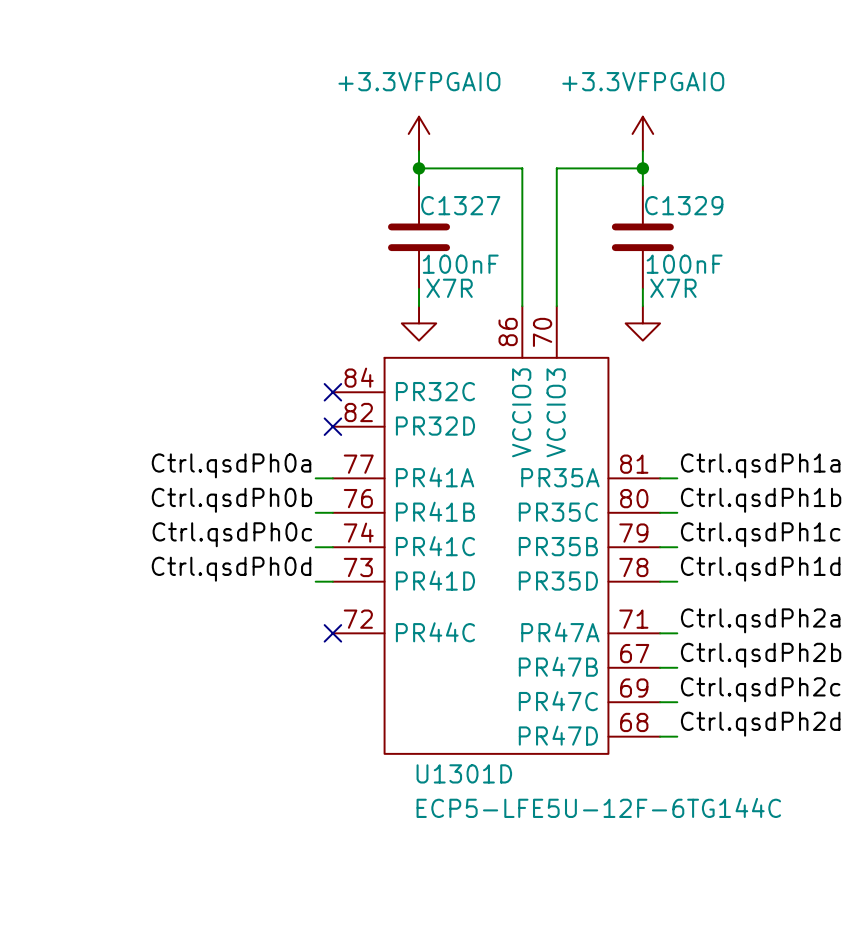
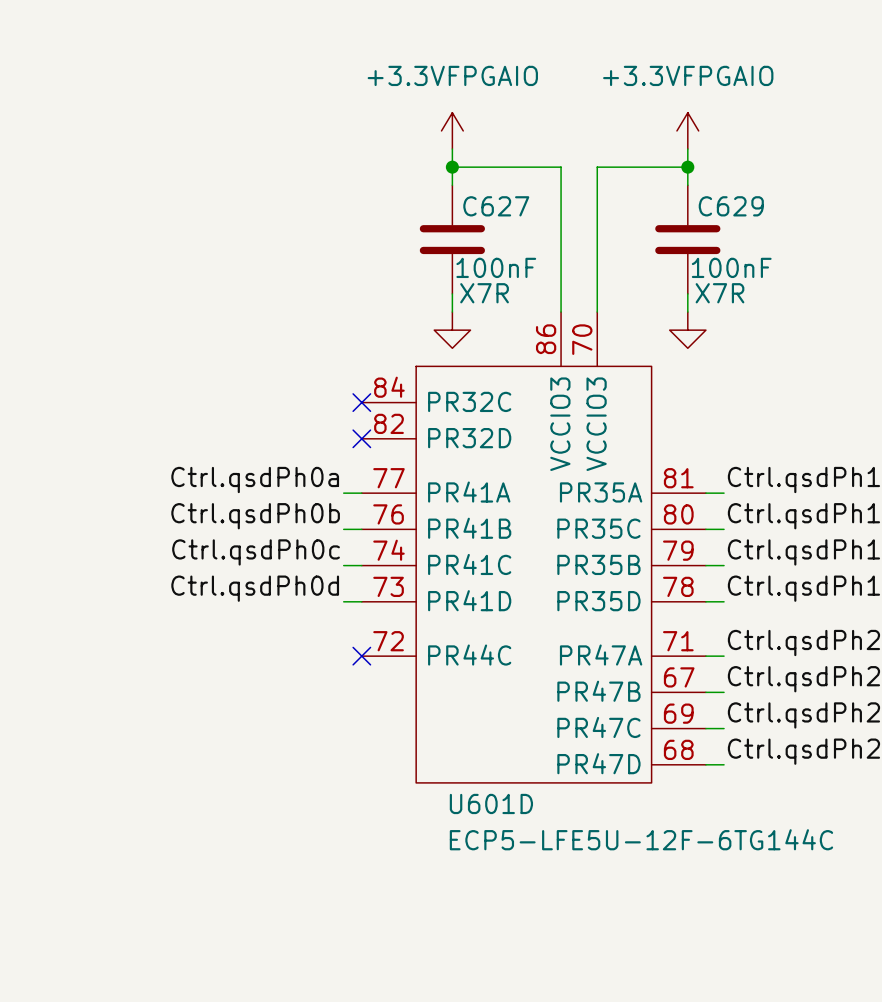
C1327 name: C1327 (460, 205) -> C627 (496, 206)
C1329 name: C1329 (684, 205) -> C629 (731, 206)
U1301D name: U1301D (464, 773) -> U601D (491, 803)

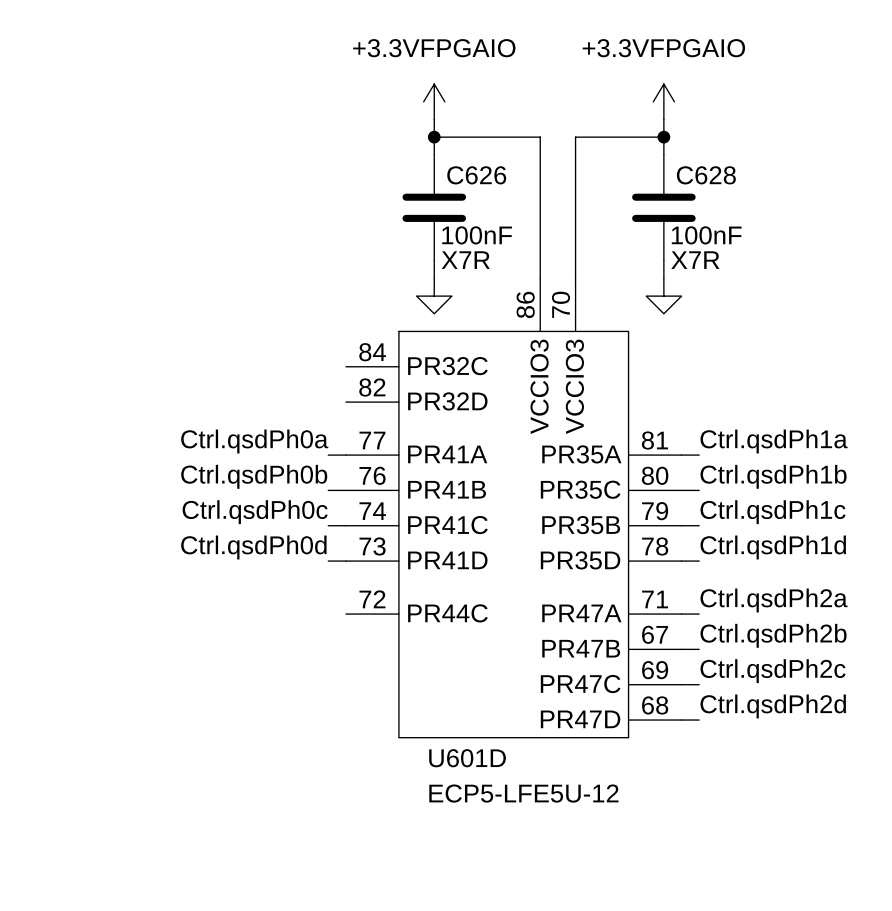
C627 name: C627 (496, 206) -> C626 (476, 175)
C629 name: C629 (731, 206) -> C628 (706, 175)
no-connect mark: (361, 402) -> none
no-connect mark: (361, 438) -> none
no-connect mark: (361, 656) -> none
U601D value: ECP5-LFE5U-12F-6TG144C (641, 839) -> ECP5-LFE5U-12 (523, 793)

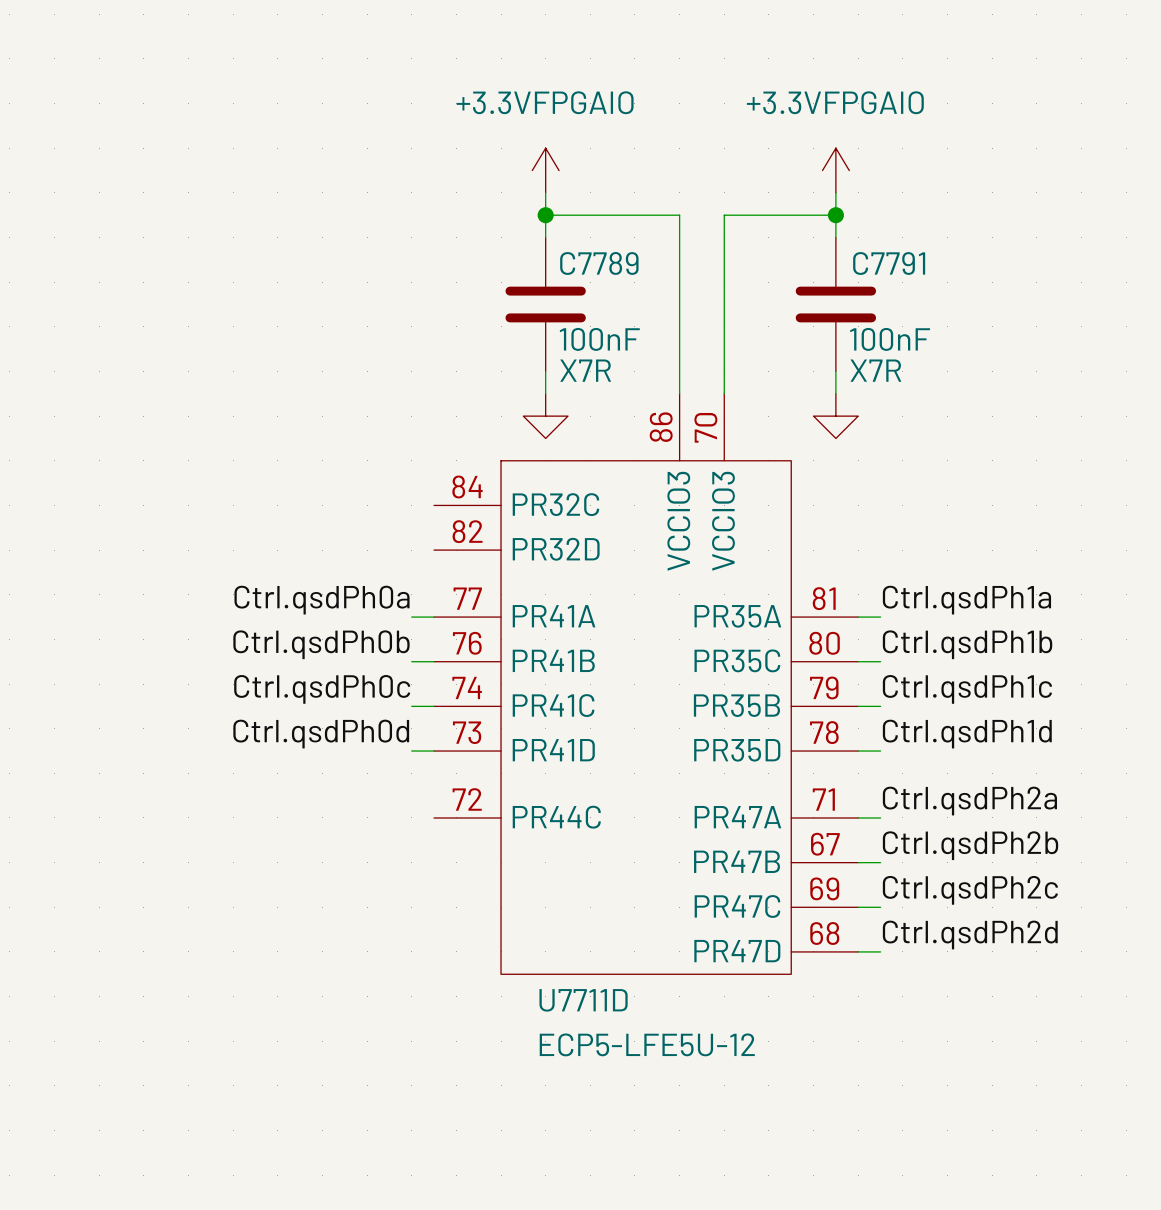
C626 name: C626 (476, 175) -> C7789 (599, 263)
C628 name: C628 (706, 175) -> C7791 (889, 263)
U601D name: U601D (467, 758) -> U7711D (583, 1000)

